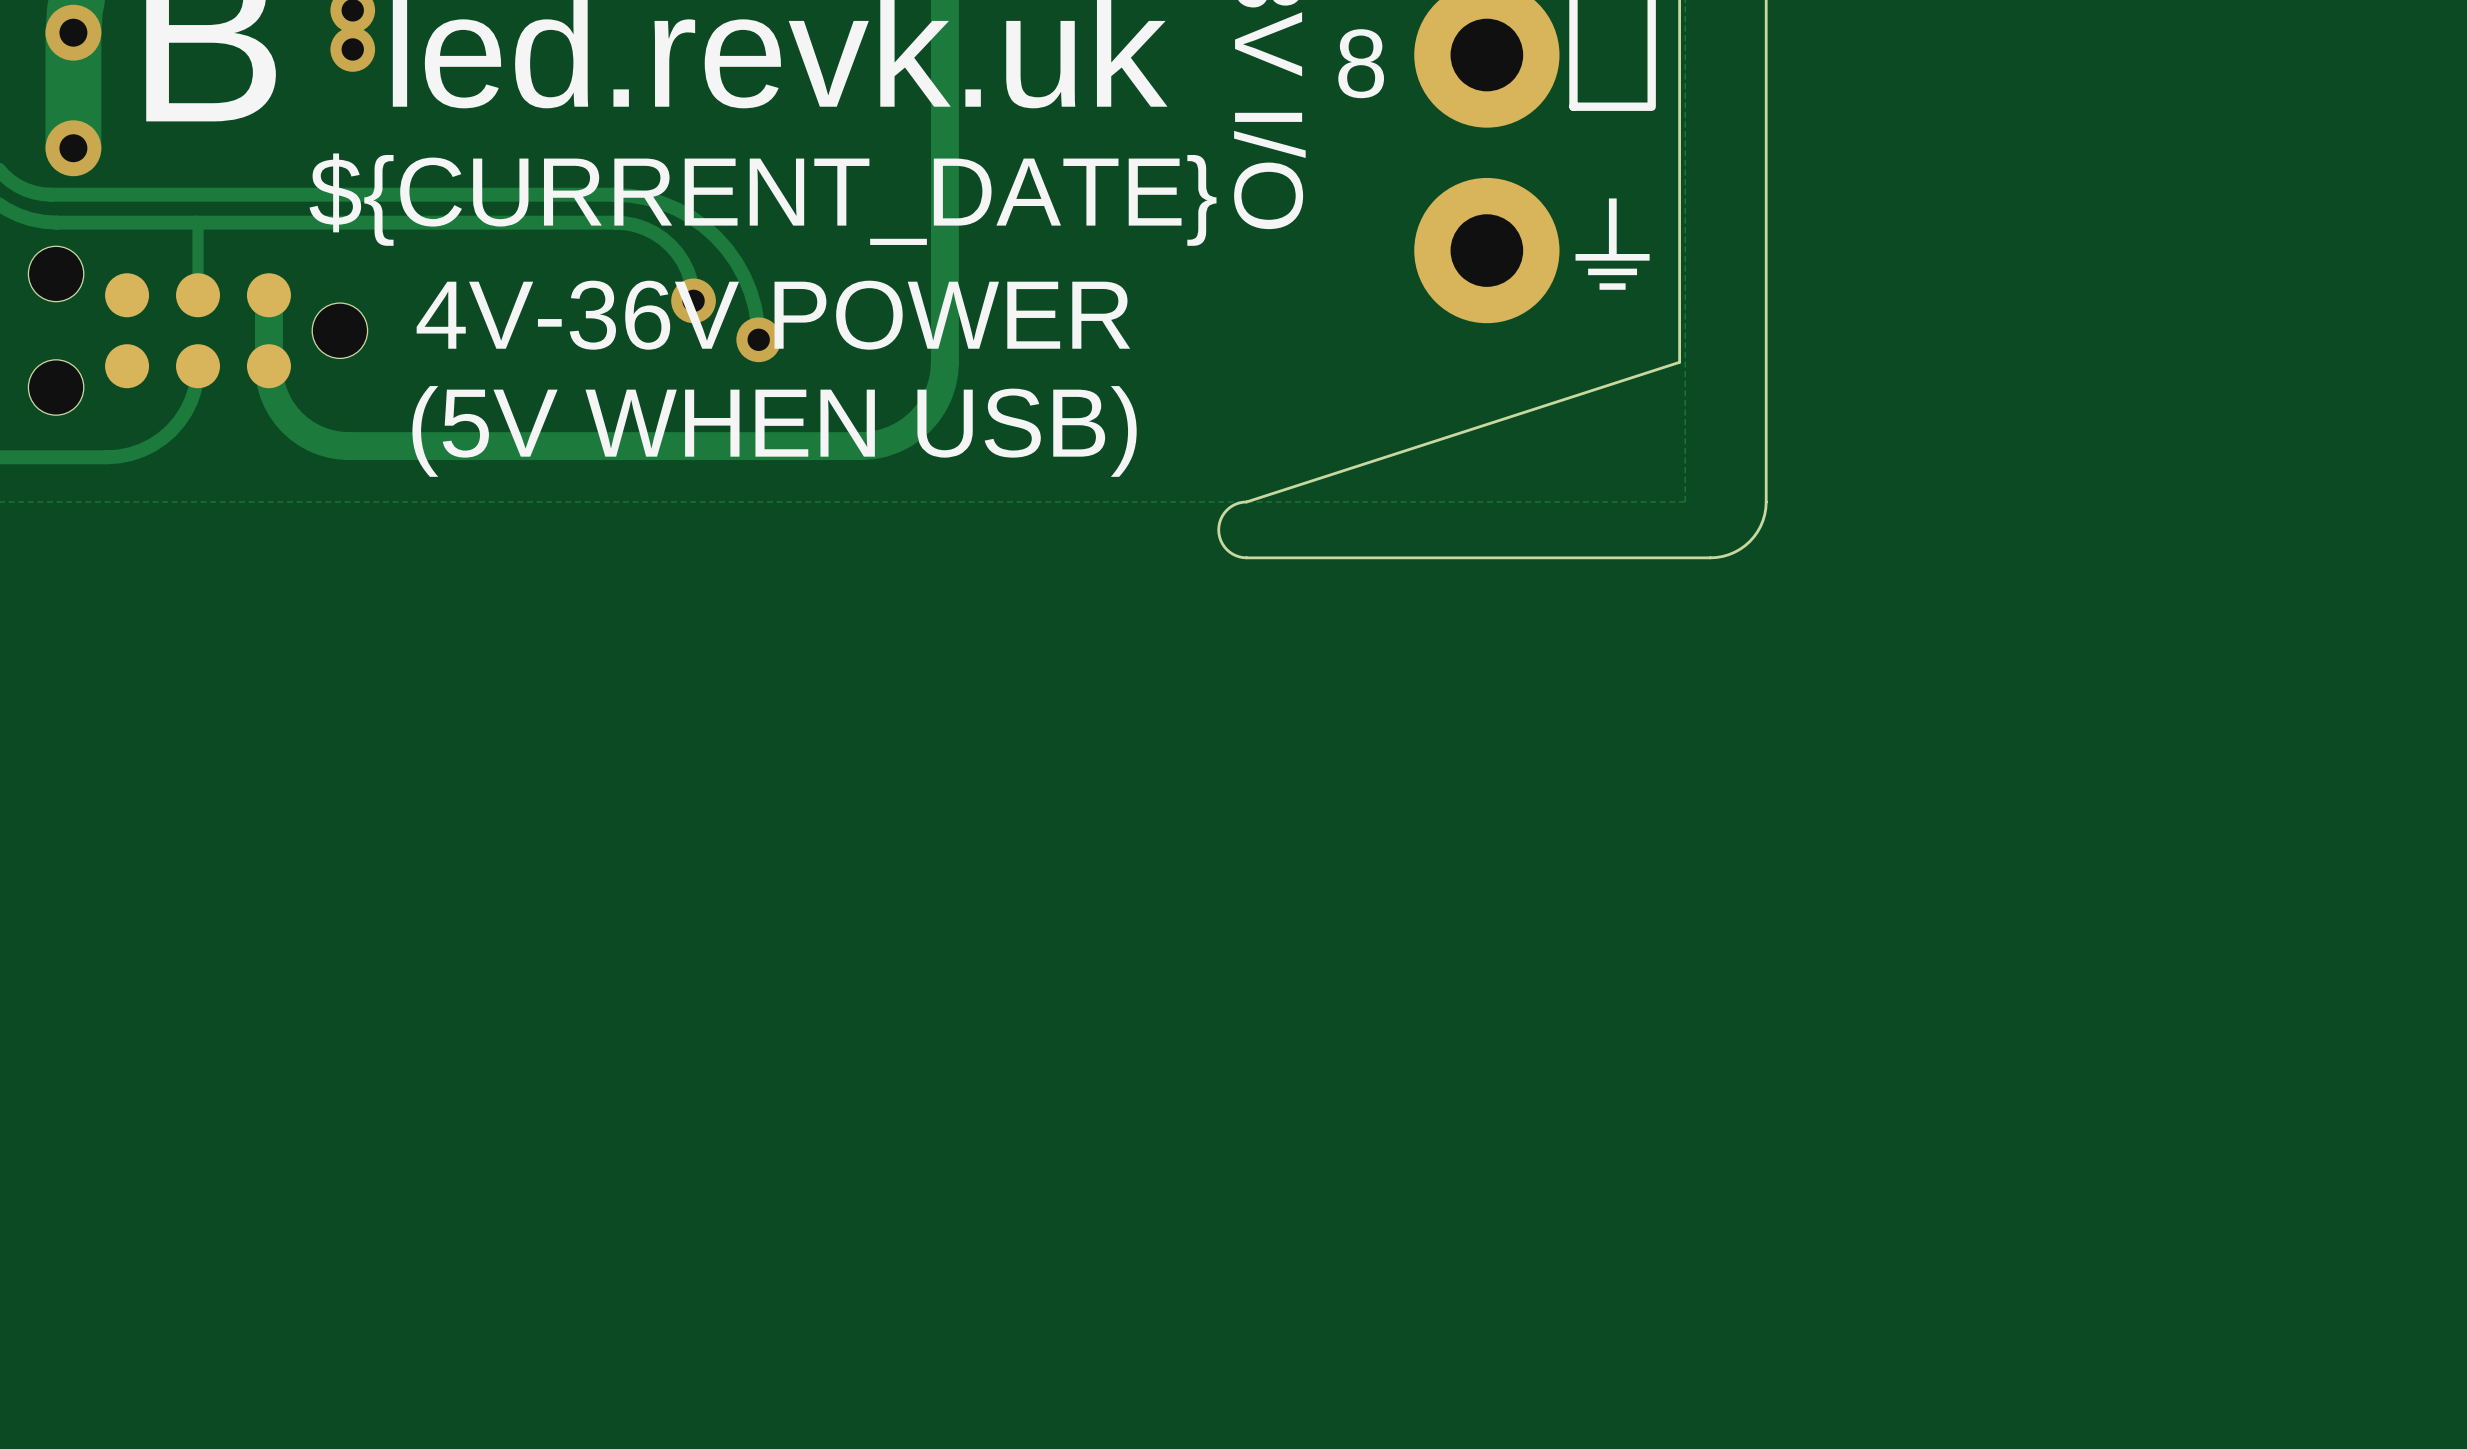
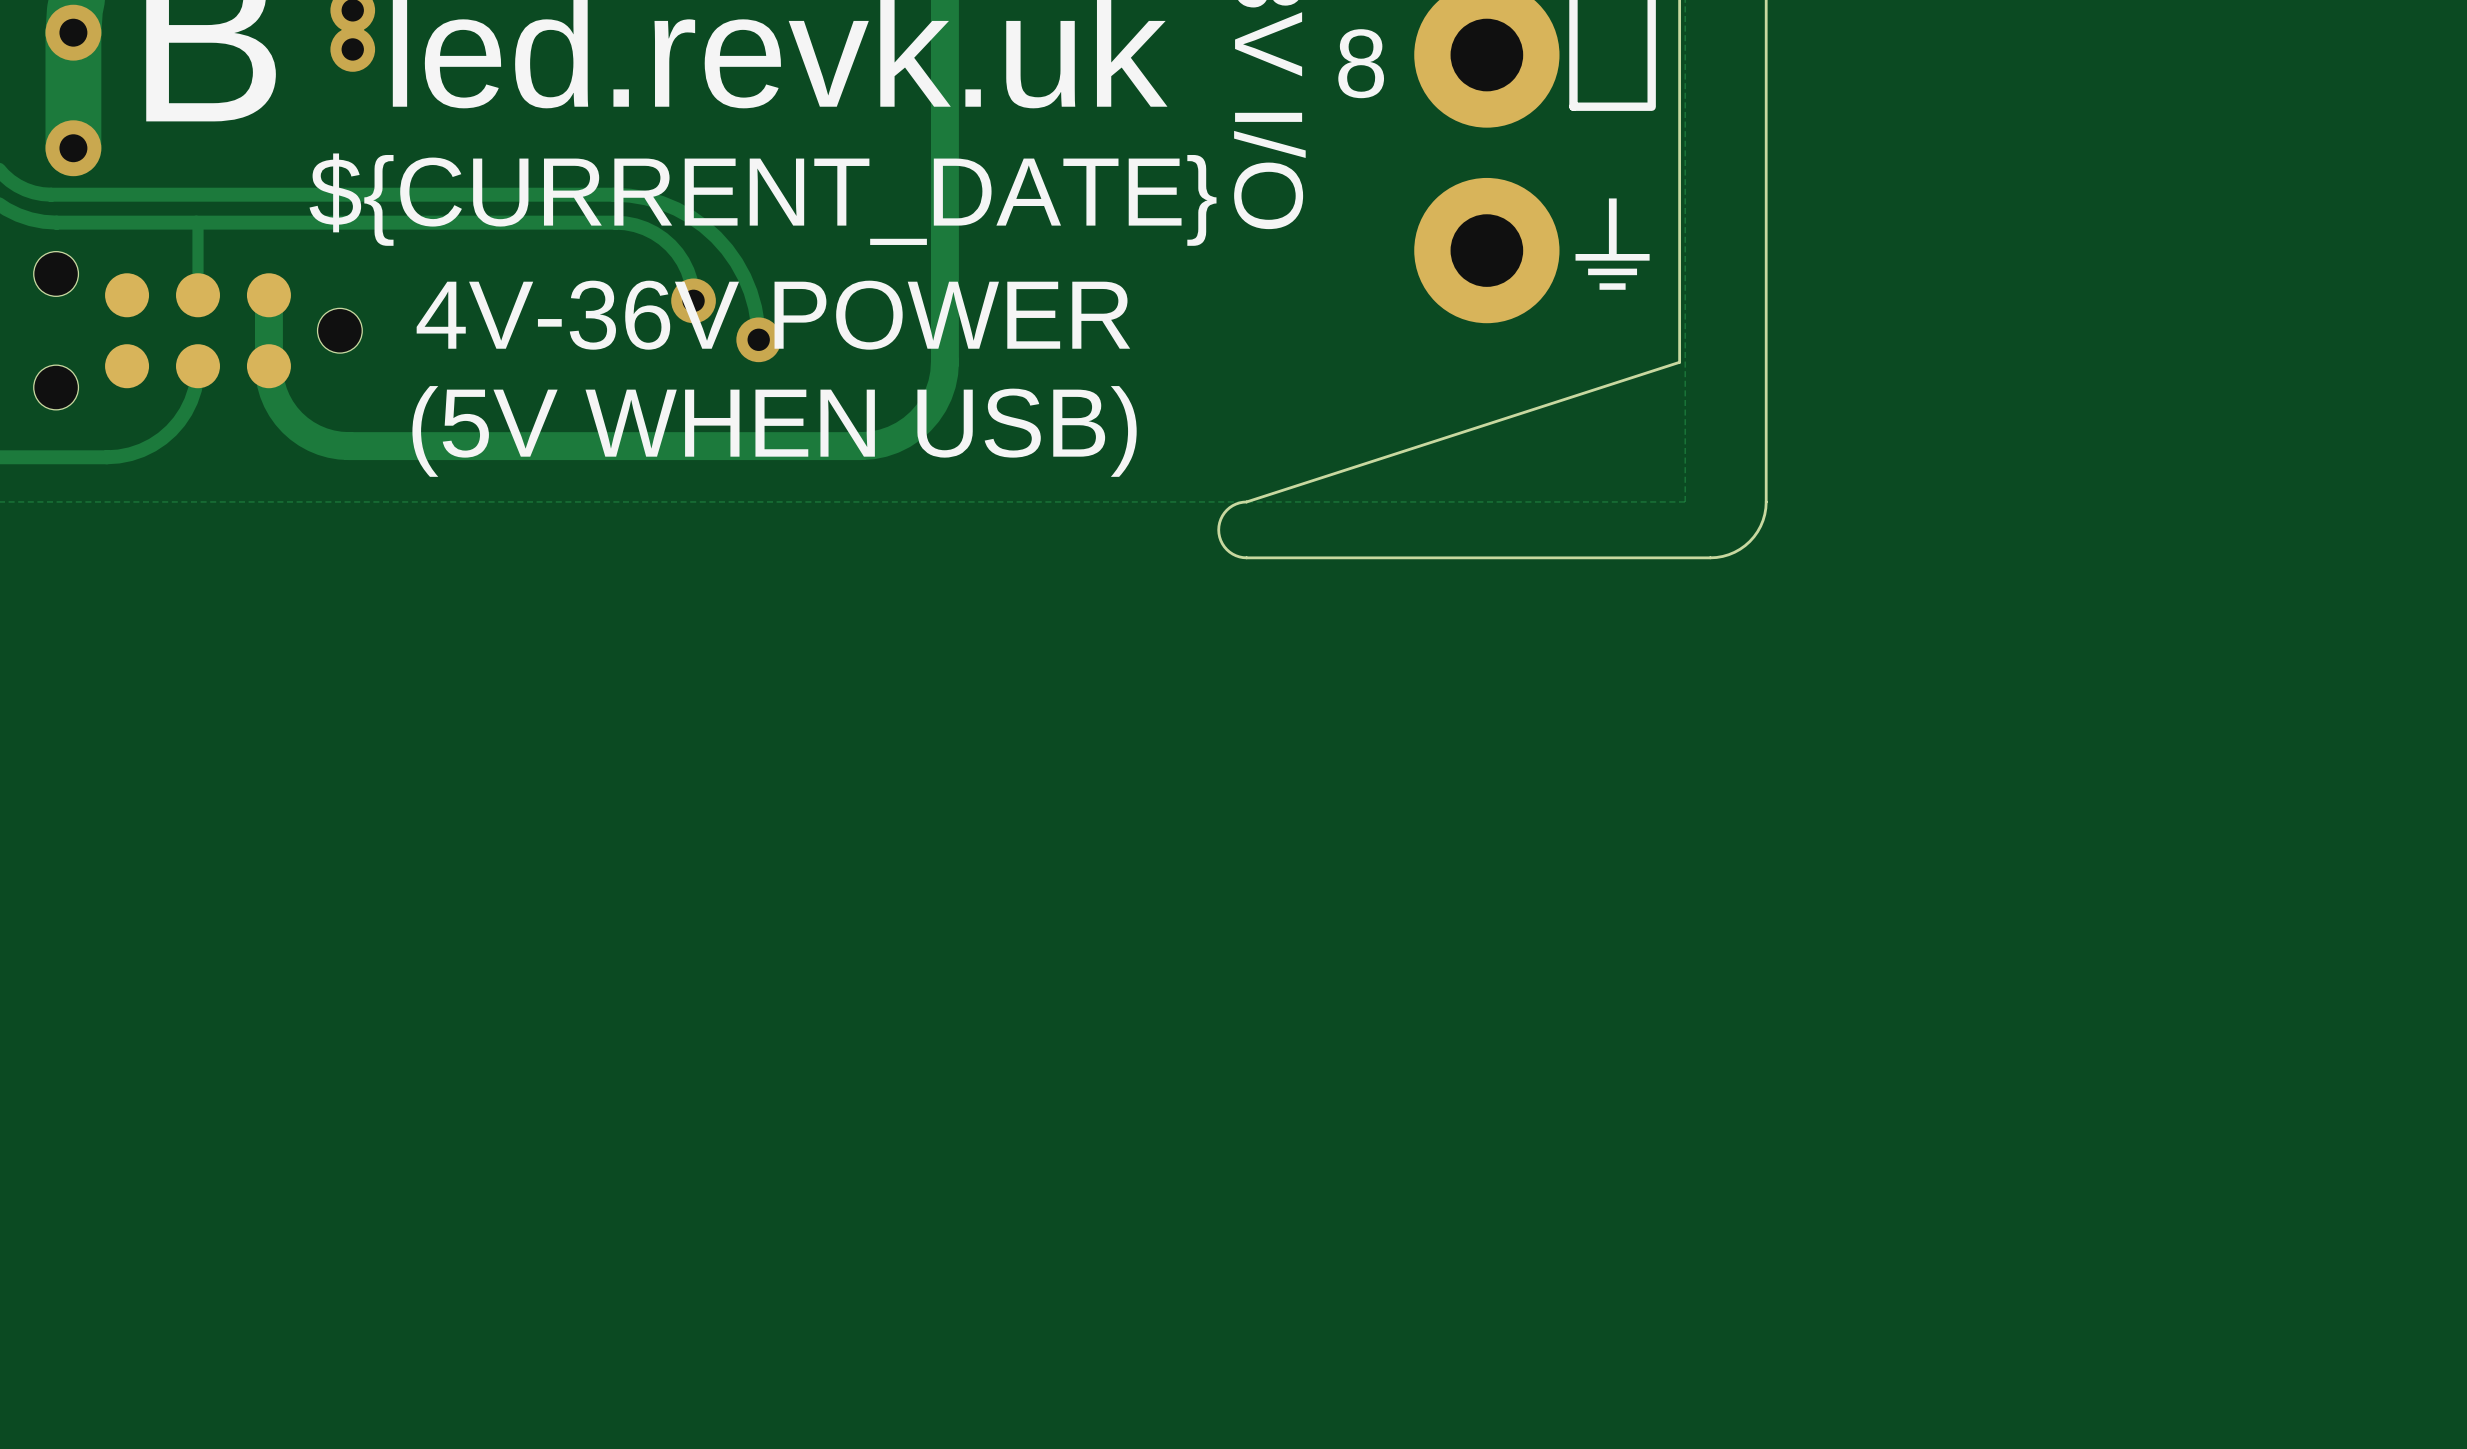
part footprint: [28, 246, 368, 416] -> [33, 251, 363, 410]

